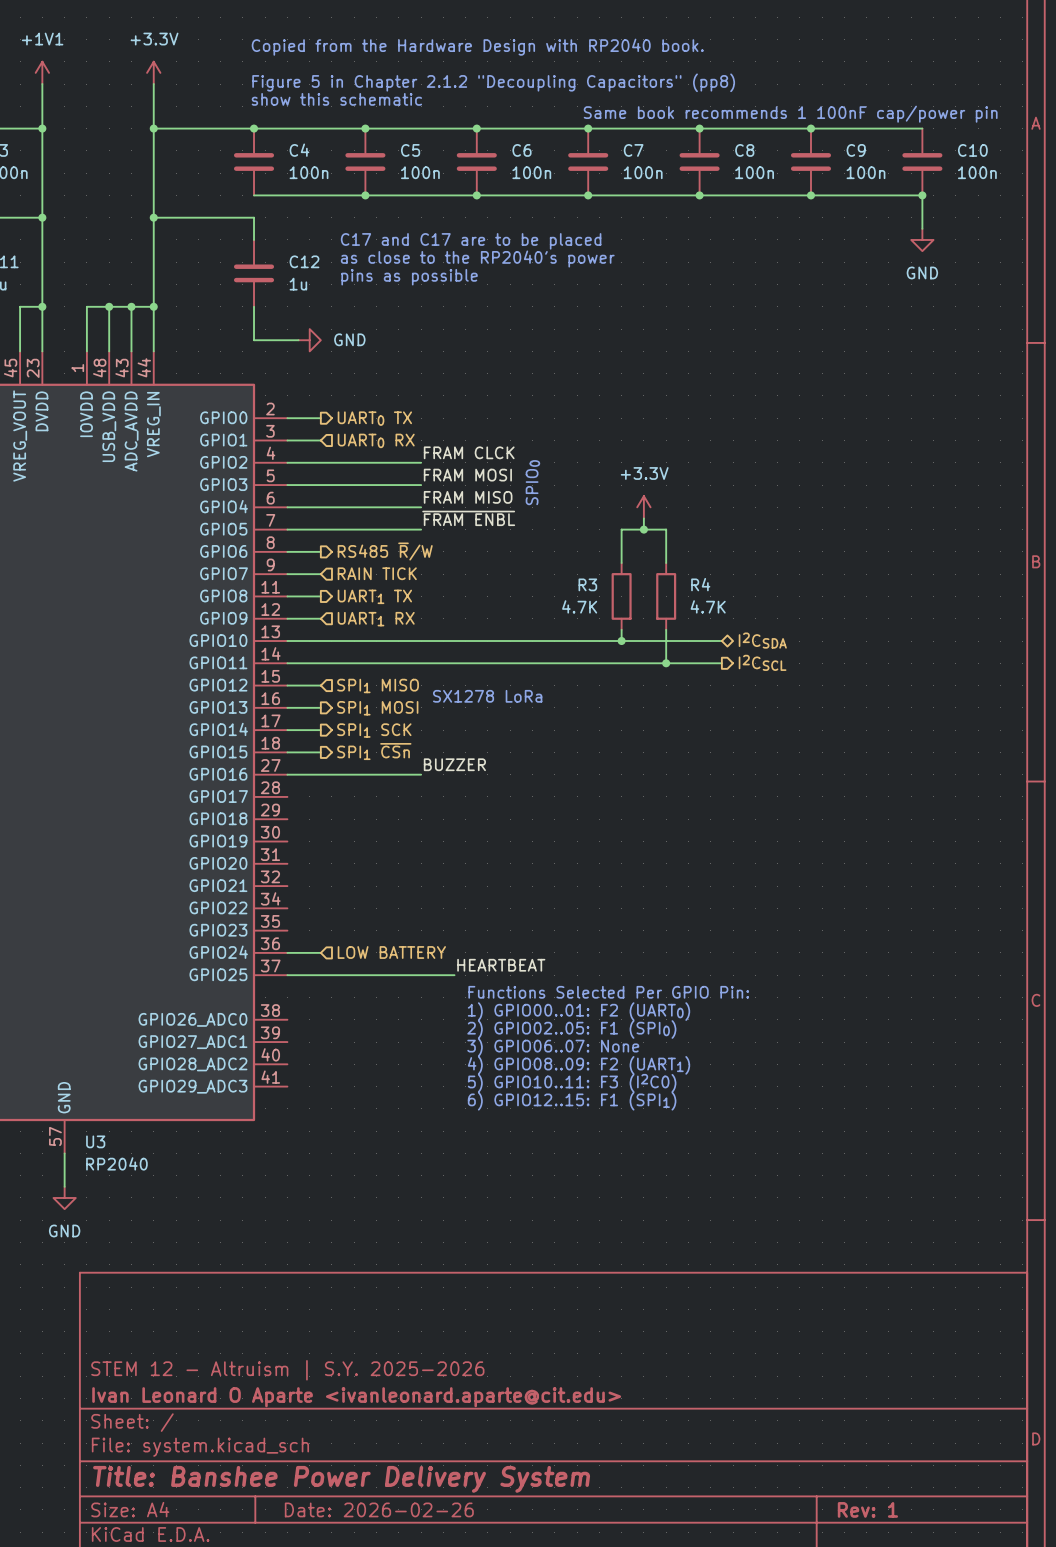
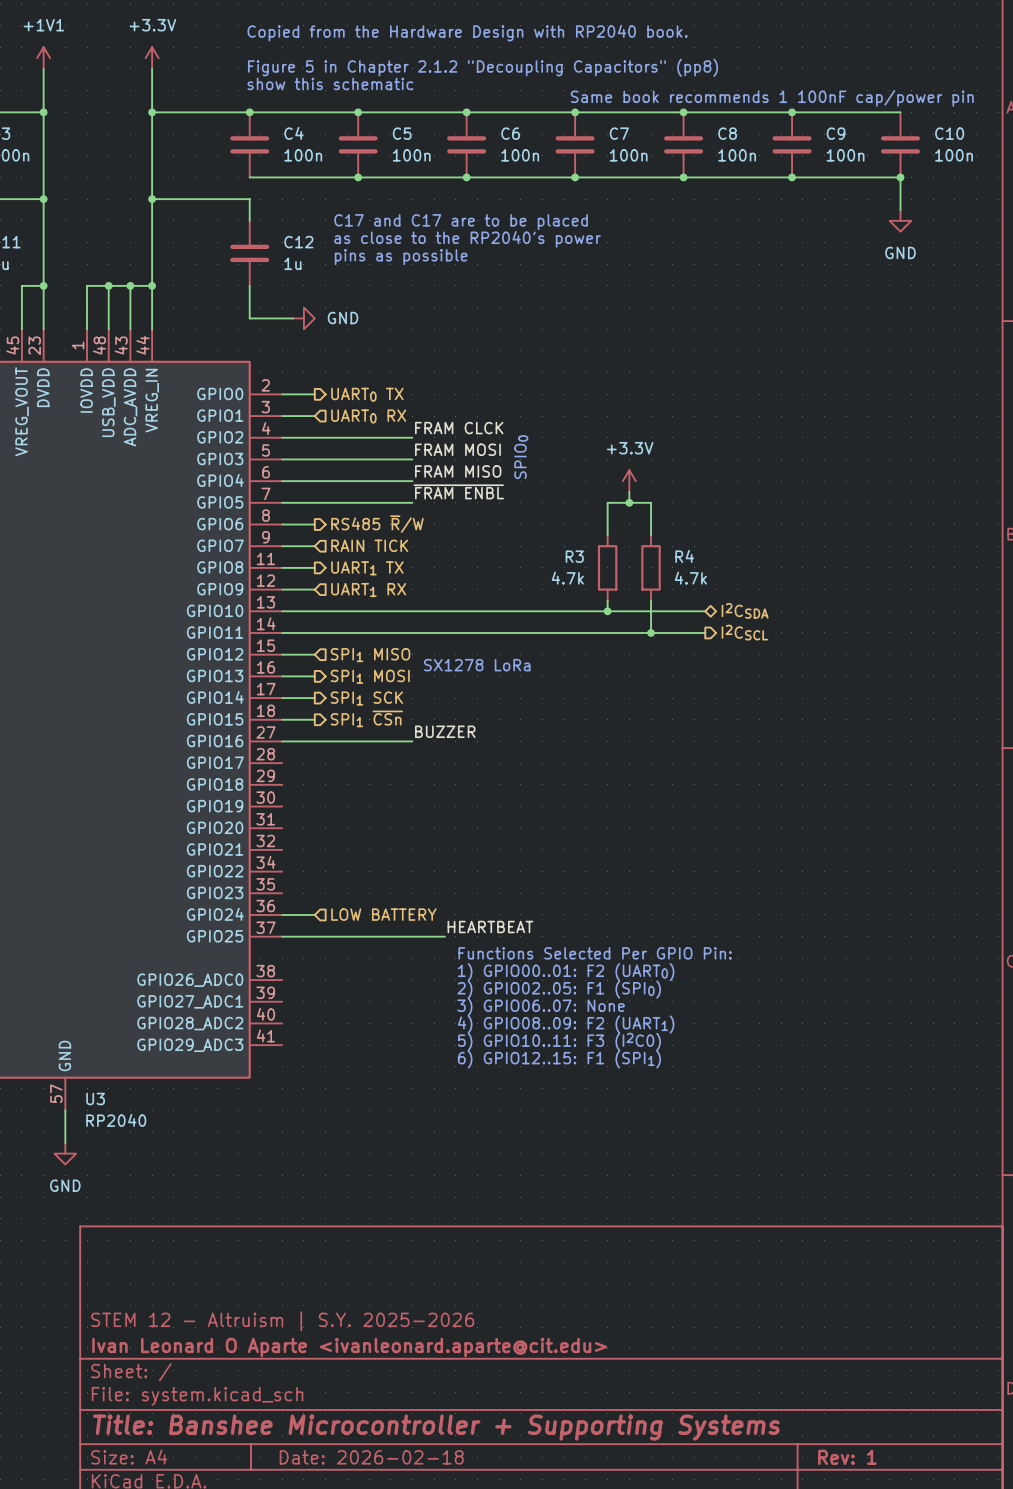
R3 value: 4.7K (579, 606) -> 4.7k (567, 578)
R4 value: 4.7K (708, 606) -> 4.7k (690, 578)
title block: Title: Banshee Power Delivery System (341, 1479) -> Title: Banshee Microcontroller + Supporting Systems (436, 1427)
title block: Date: 2026-02-26 (379, 1509) -> Date: 2026-02-18 (371, 1457)

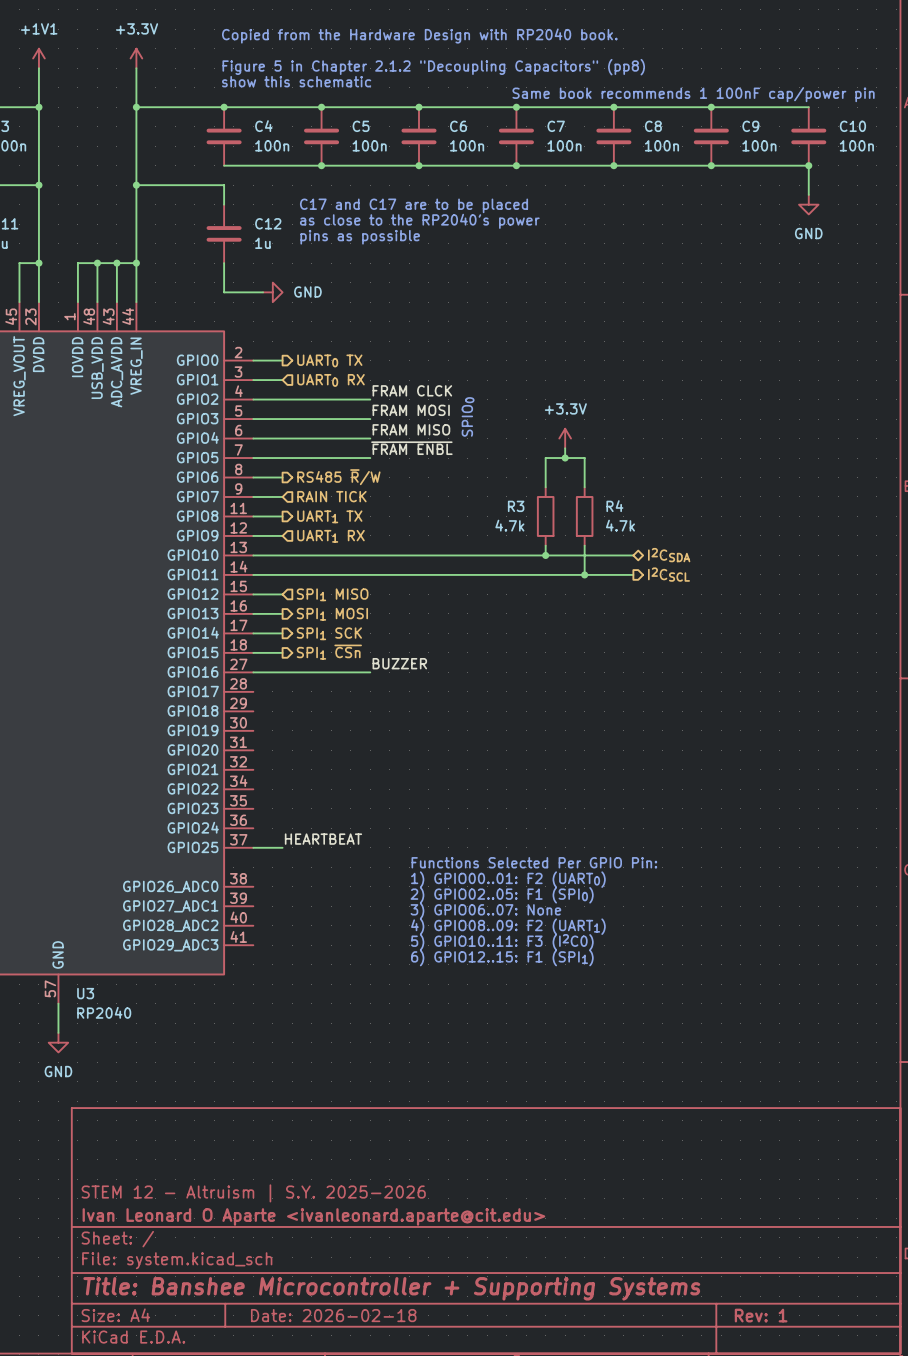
text: SX1278 LoRa (477, 665) -> none
wire: (282, 914) (314, 914) -> none
hierarchical label: LOW BATTERY (383, 914) -> none
label position: HEARTBEAT (490, 927) -> HEARTBEAT (323, 839)
wire: (314, 936) (444, 936) -> none

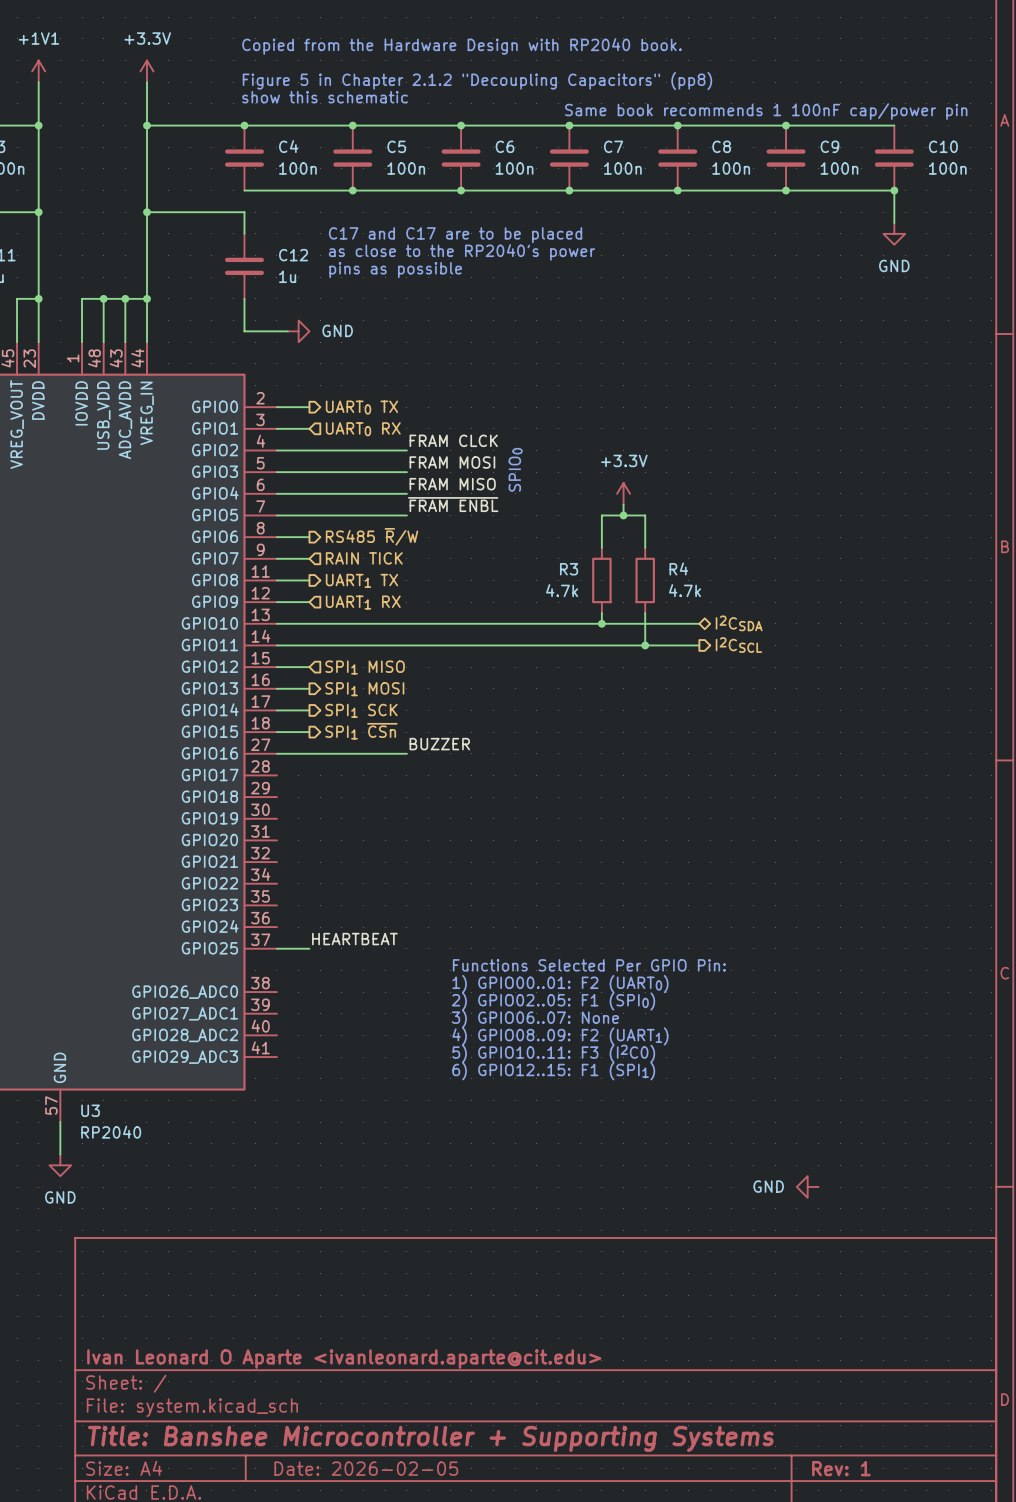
power symbol: none -> GND (807, 1187)
title block: STEM 12 - Altruism | S.Y. 2025-2026 (253, 1193) -> none
title block: Date: 2026-02-18 (333, 1315) -> Date: 2026-02-05 (366, 1468)

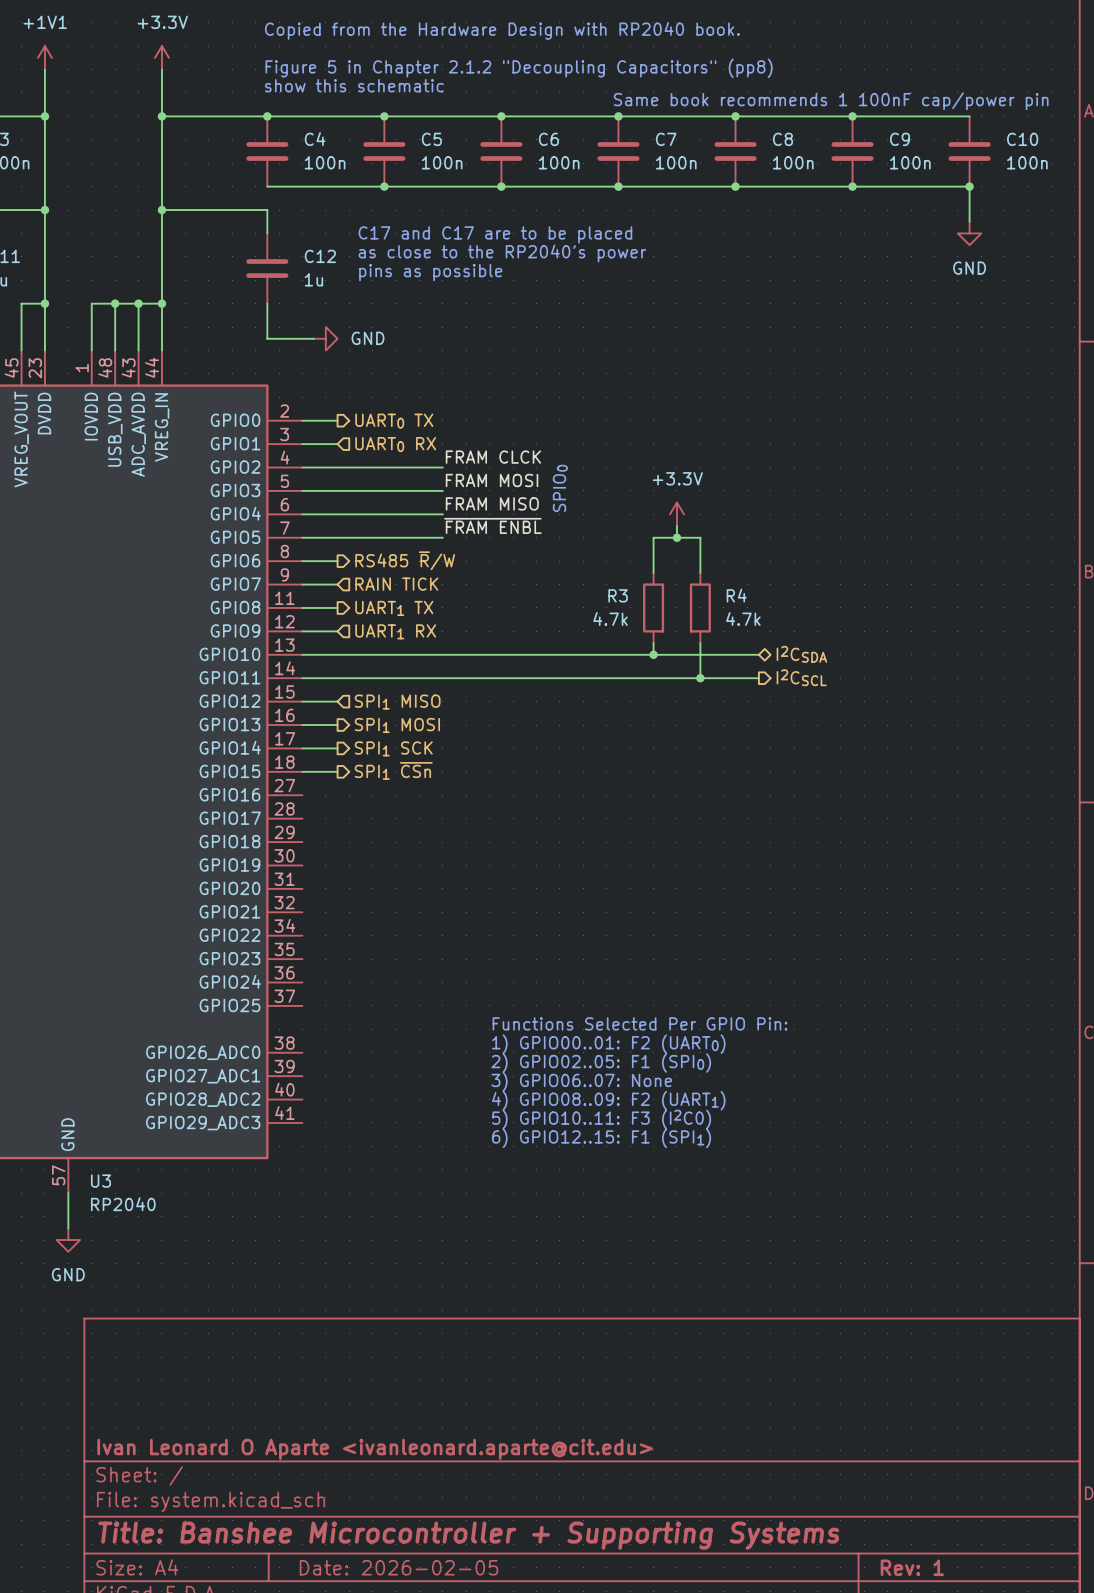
label: BUZZER (439, 744) -> none
wire: (276, 753) (406, 753) -> none
label: HEARTBEAT (354, 939) -> none
wire: (276, 948) (309, 948) -> none
power symbol: GND (807, 1187) -> none

